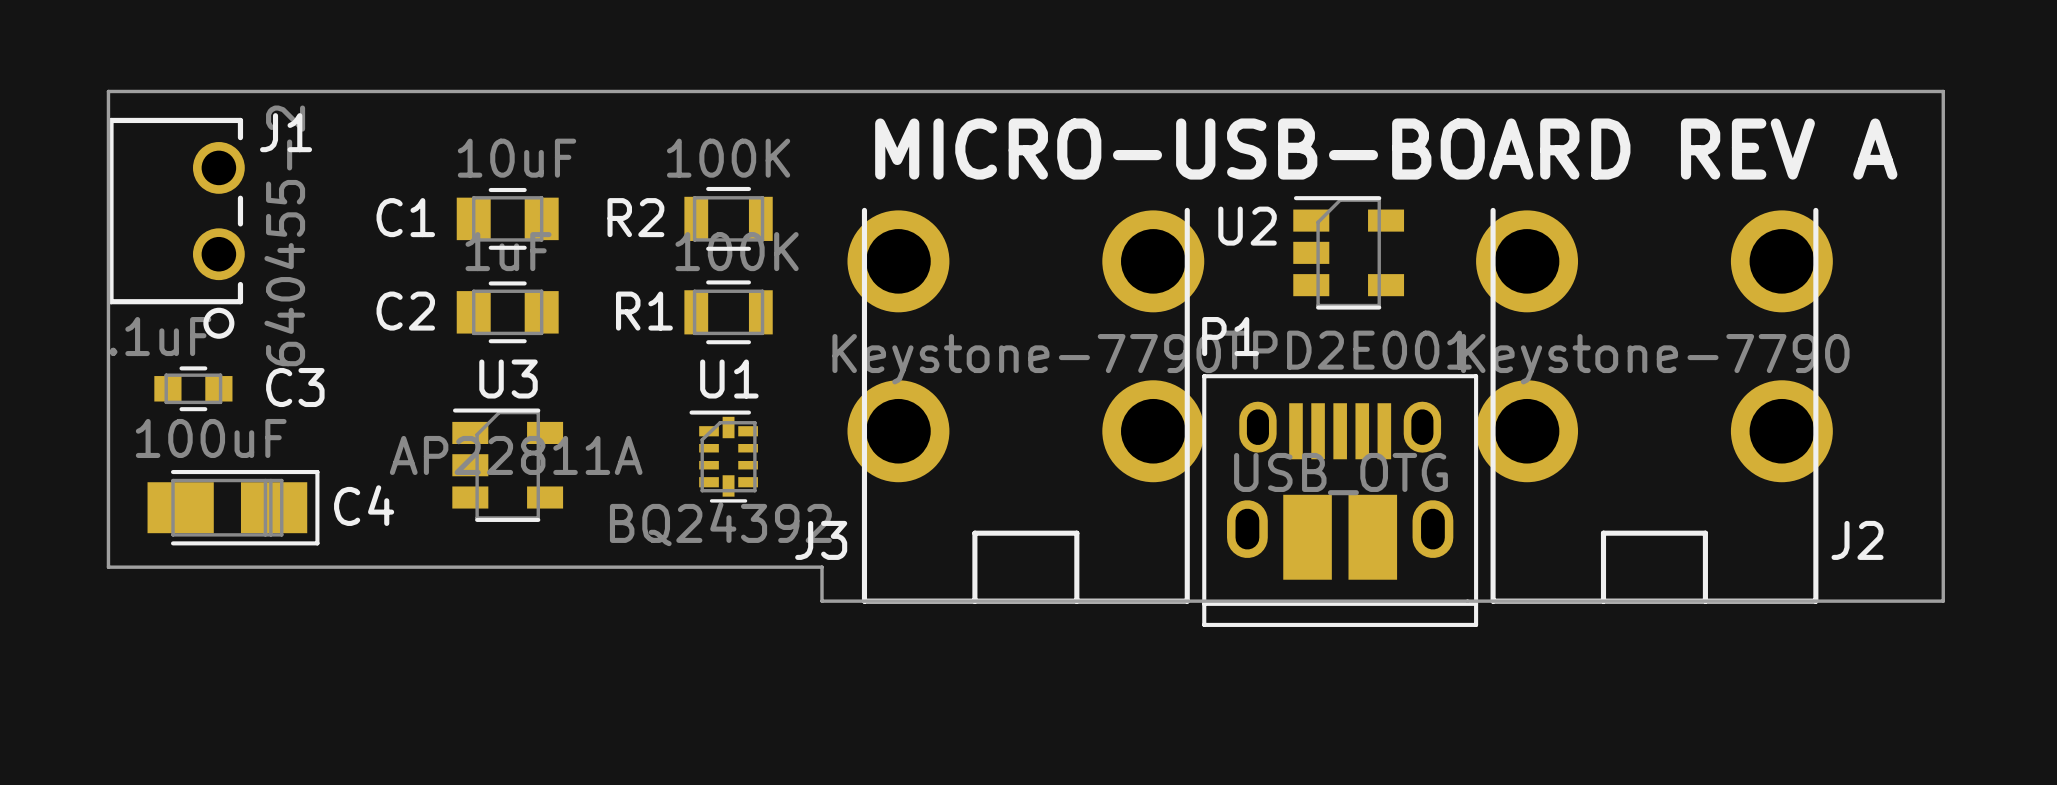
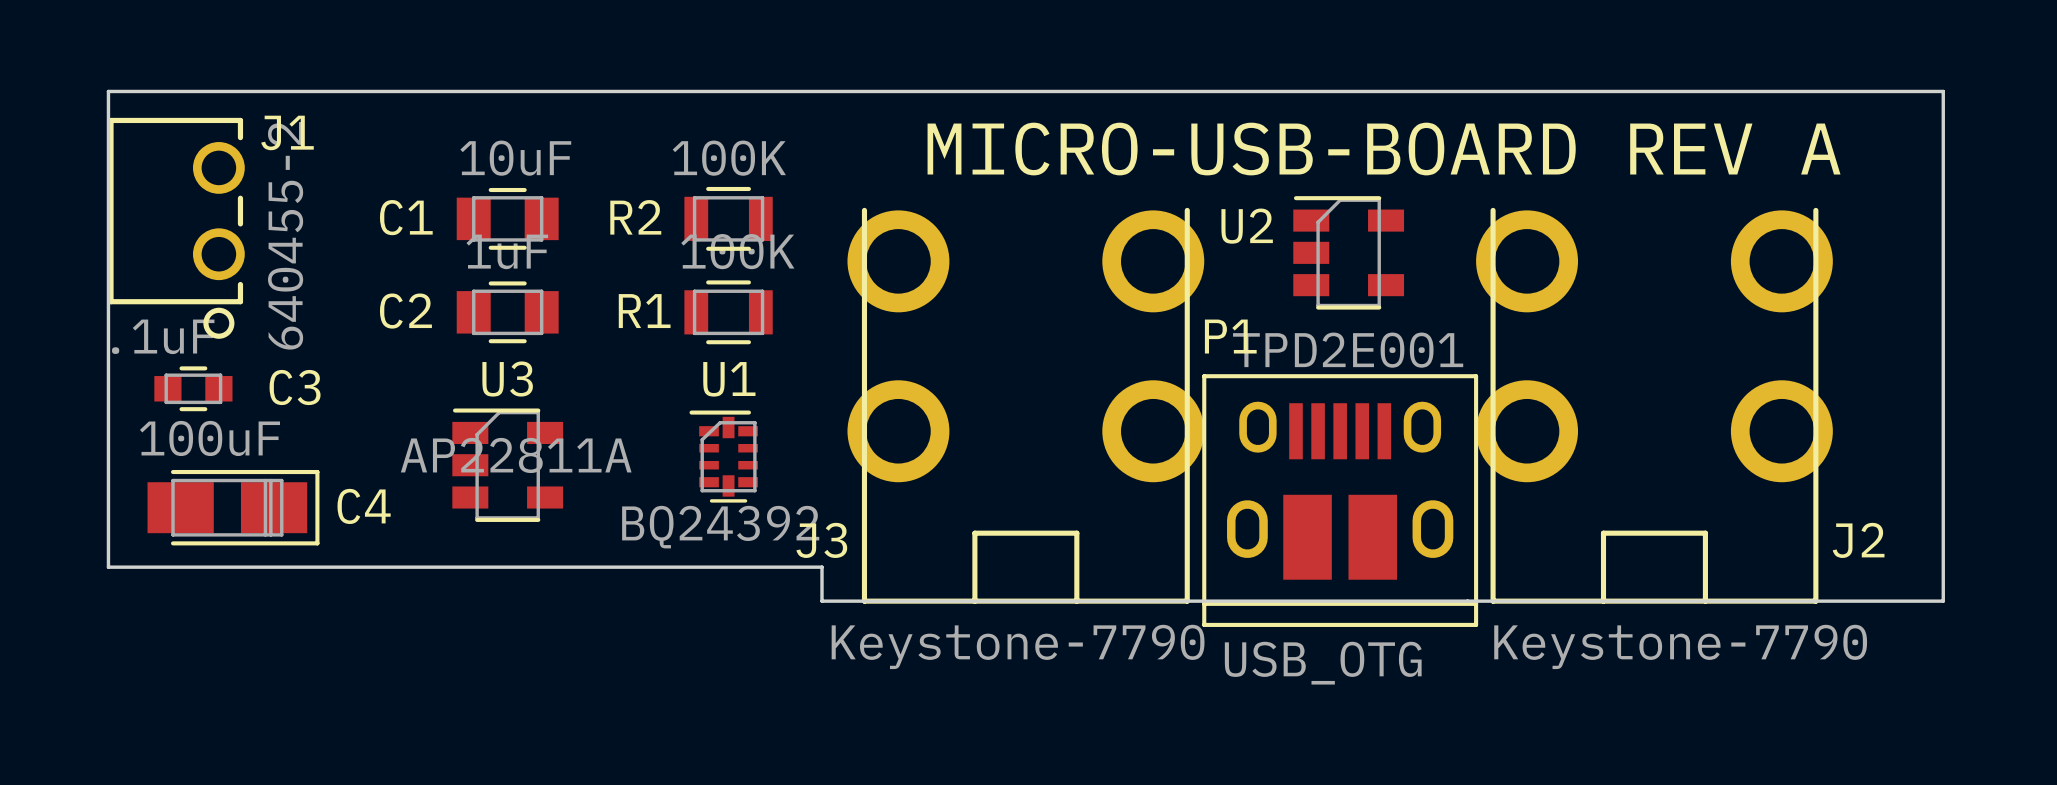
J3 value position: Keystone-7790 (1026, 359) -> Keystone-7790 (1018, 646)
J2 value position: Keystone-7790 (1655, 359) -> Keystone-7790 (1680, 646)
P1 value position: USB_OTG (1340, 474) -> USB_OTG (1323, 663)

